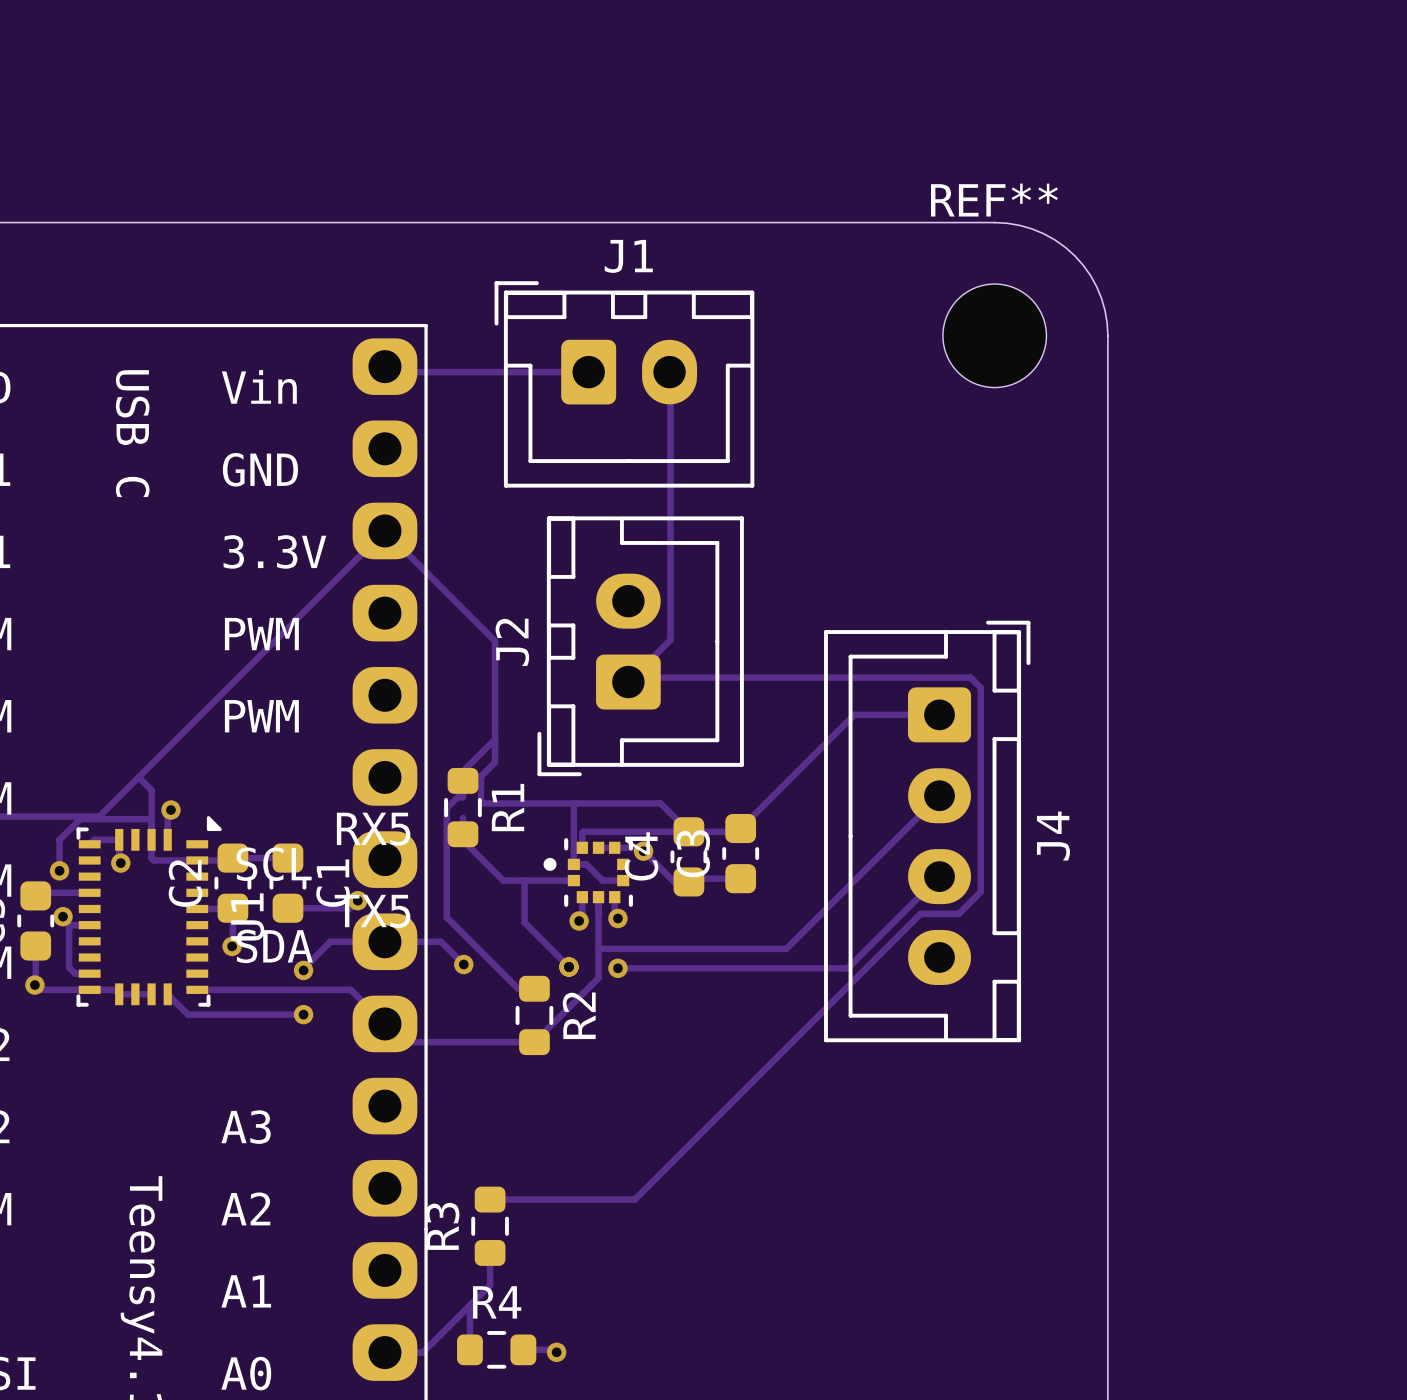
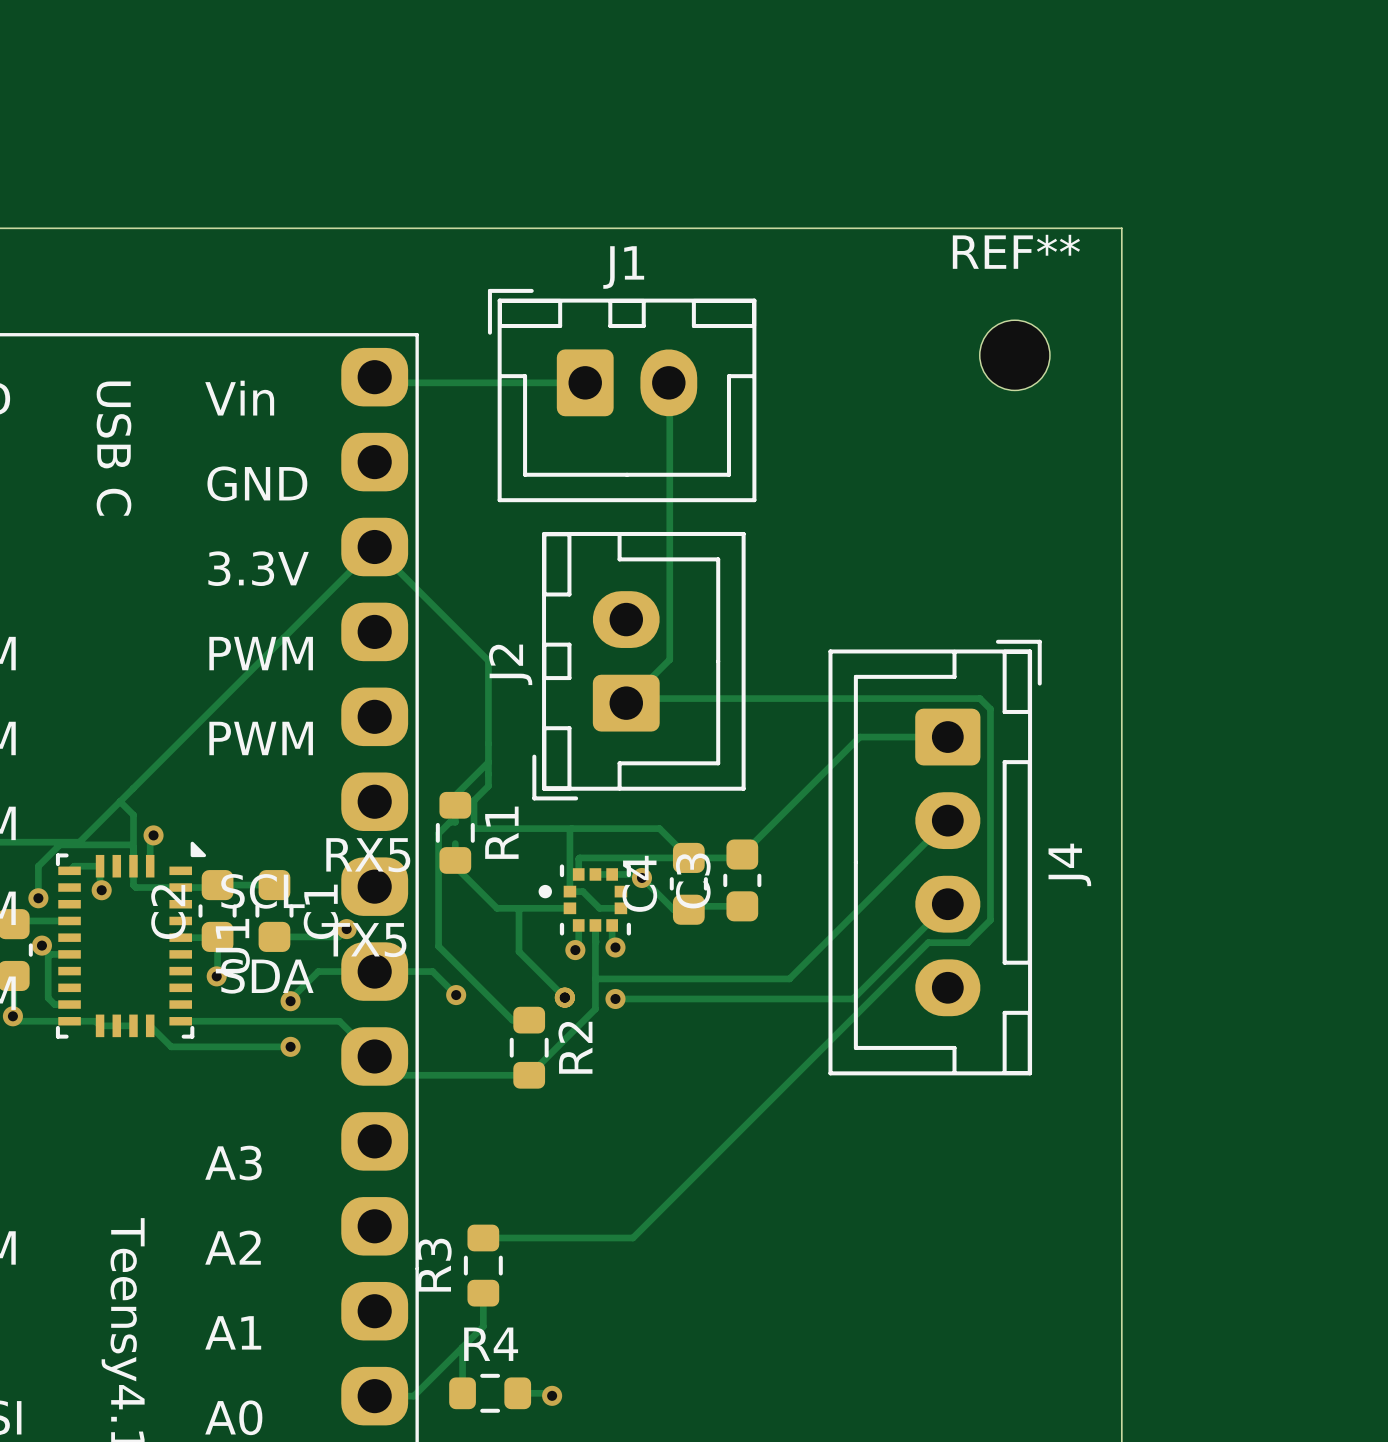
REF** name position: REF** (994, 200) -> REF** (1016, 251)
board edge: (994, 222) (1032, 228) (1054, 239) (1074, 255) (1096, 286) (1105, 310) (1107, 335) -> (1004, 228) (1121, 228) (1121, 345)
REF** footprint: [942, 284, 1047, 388] -> [979, 320, 1050, 391]

